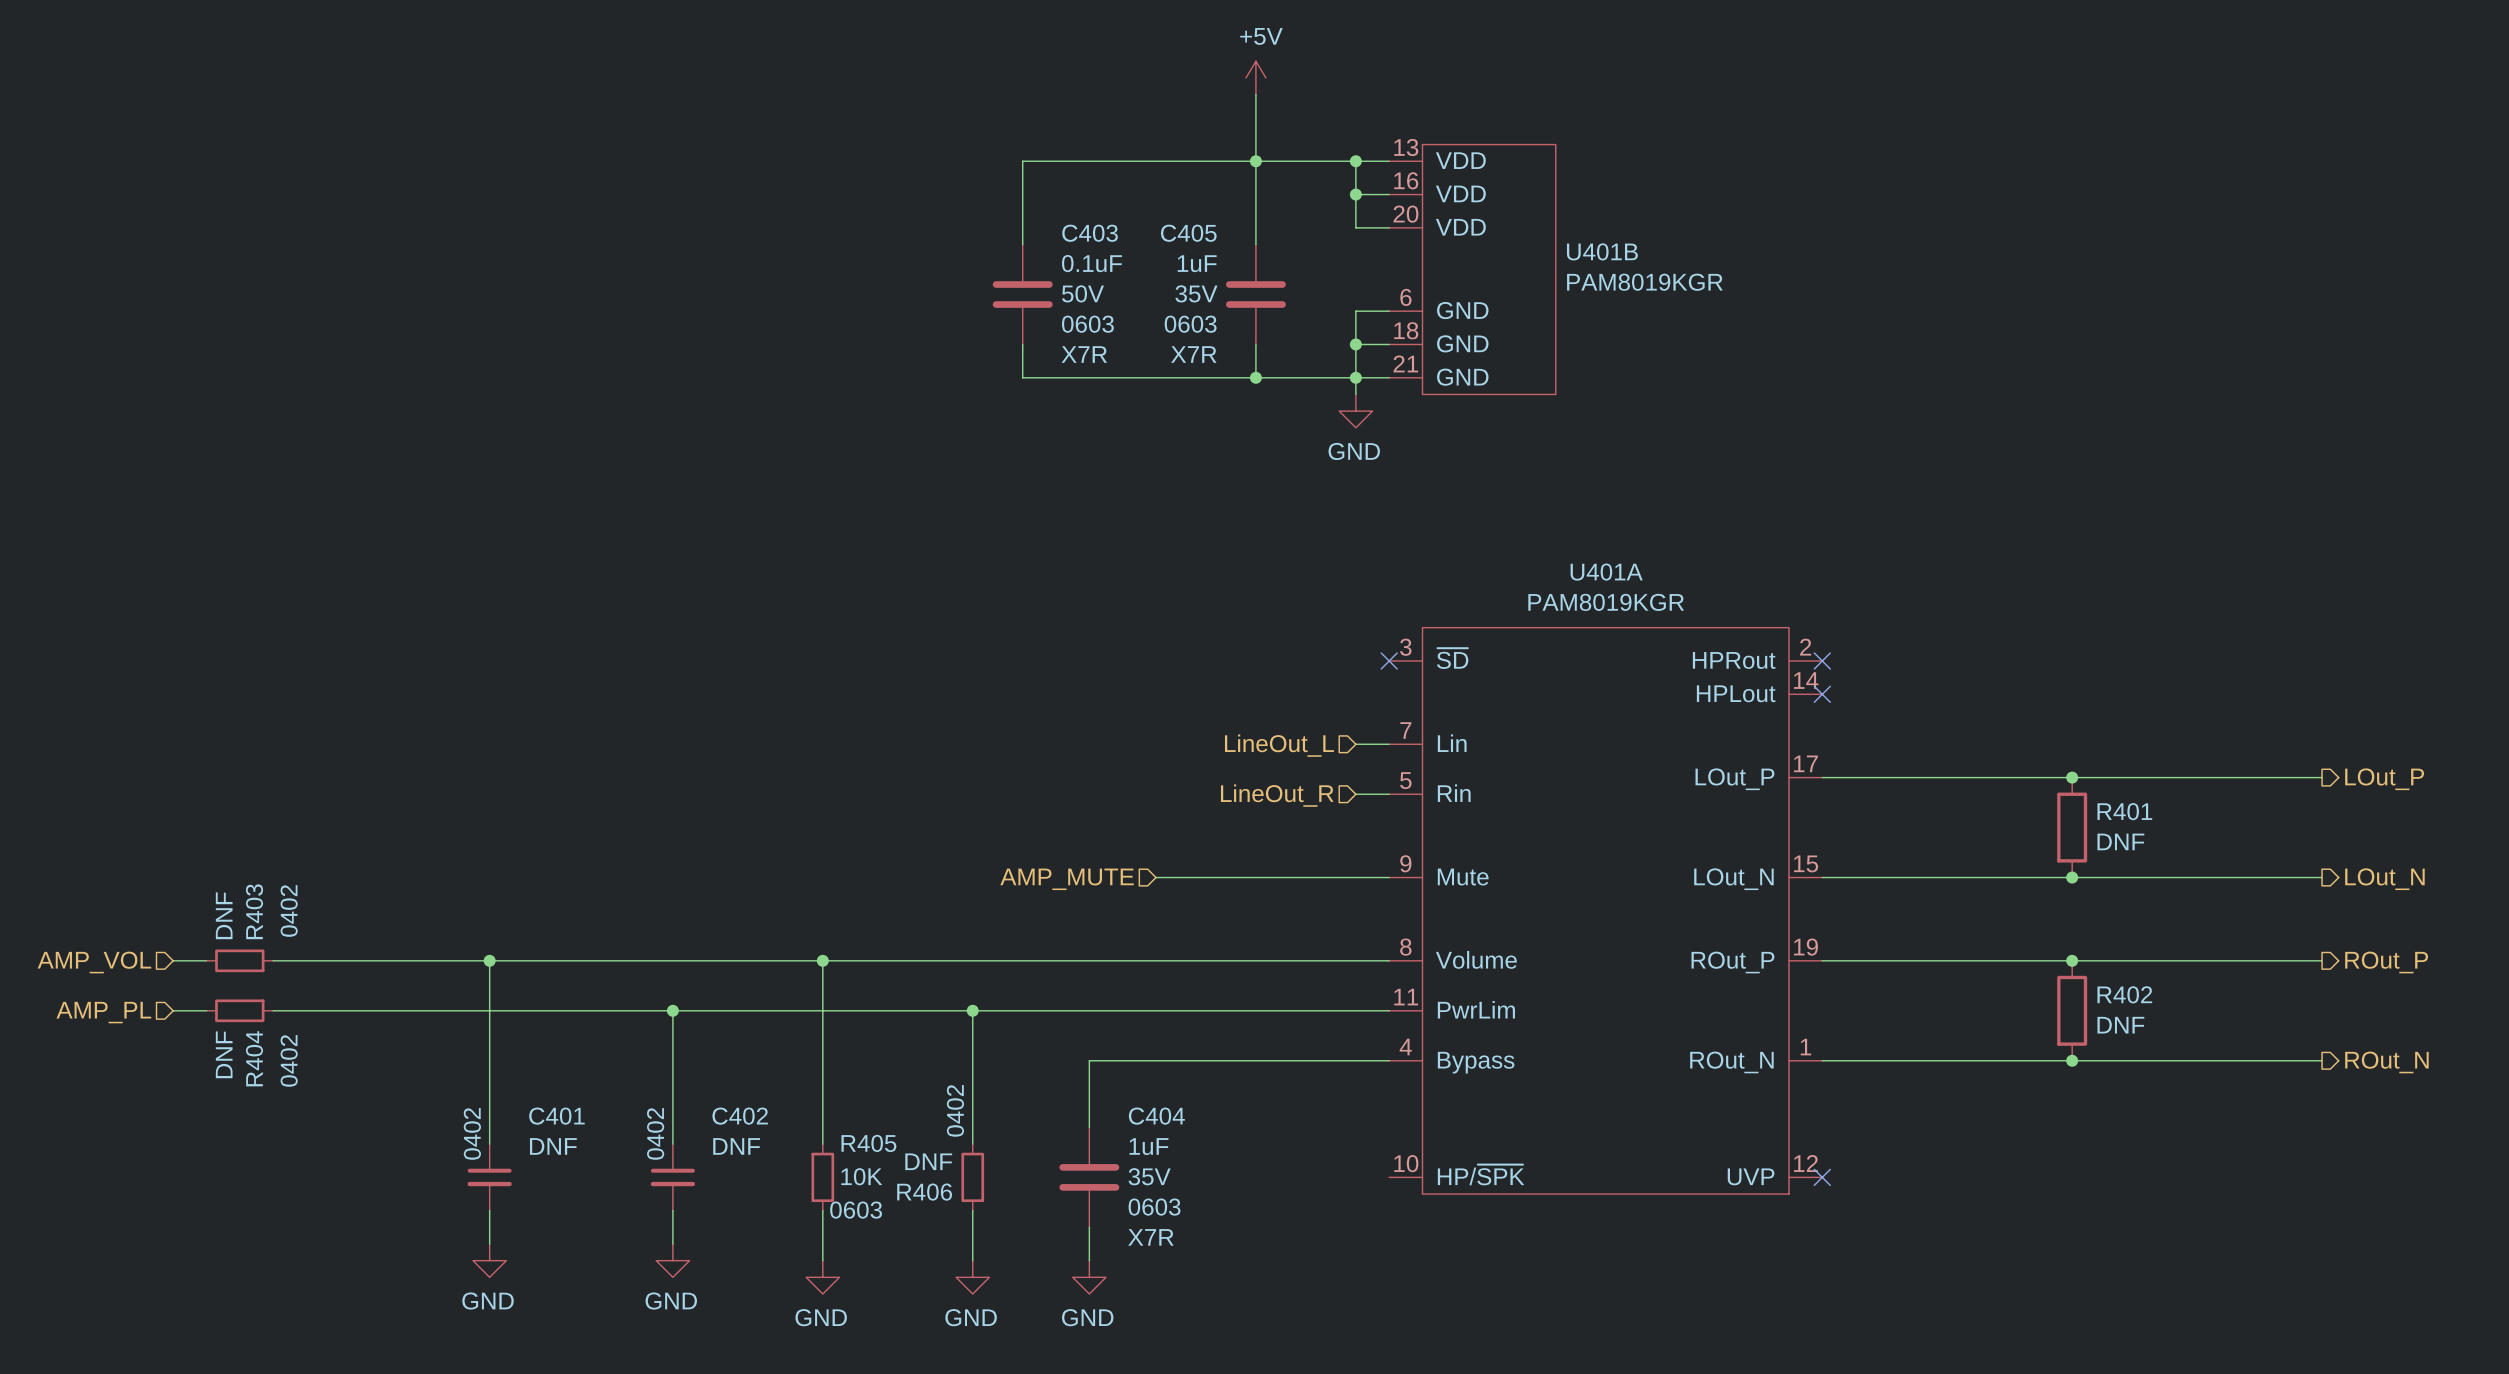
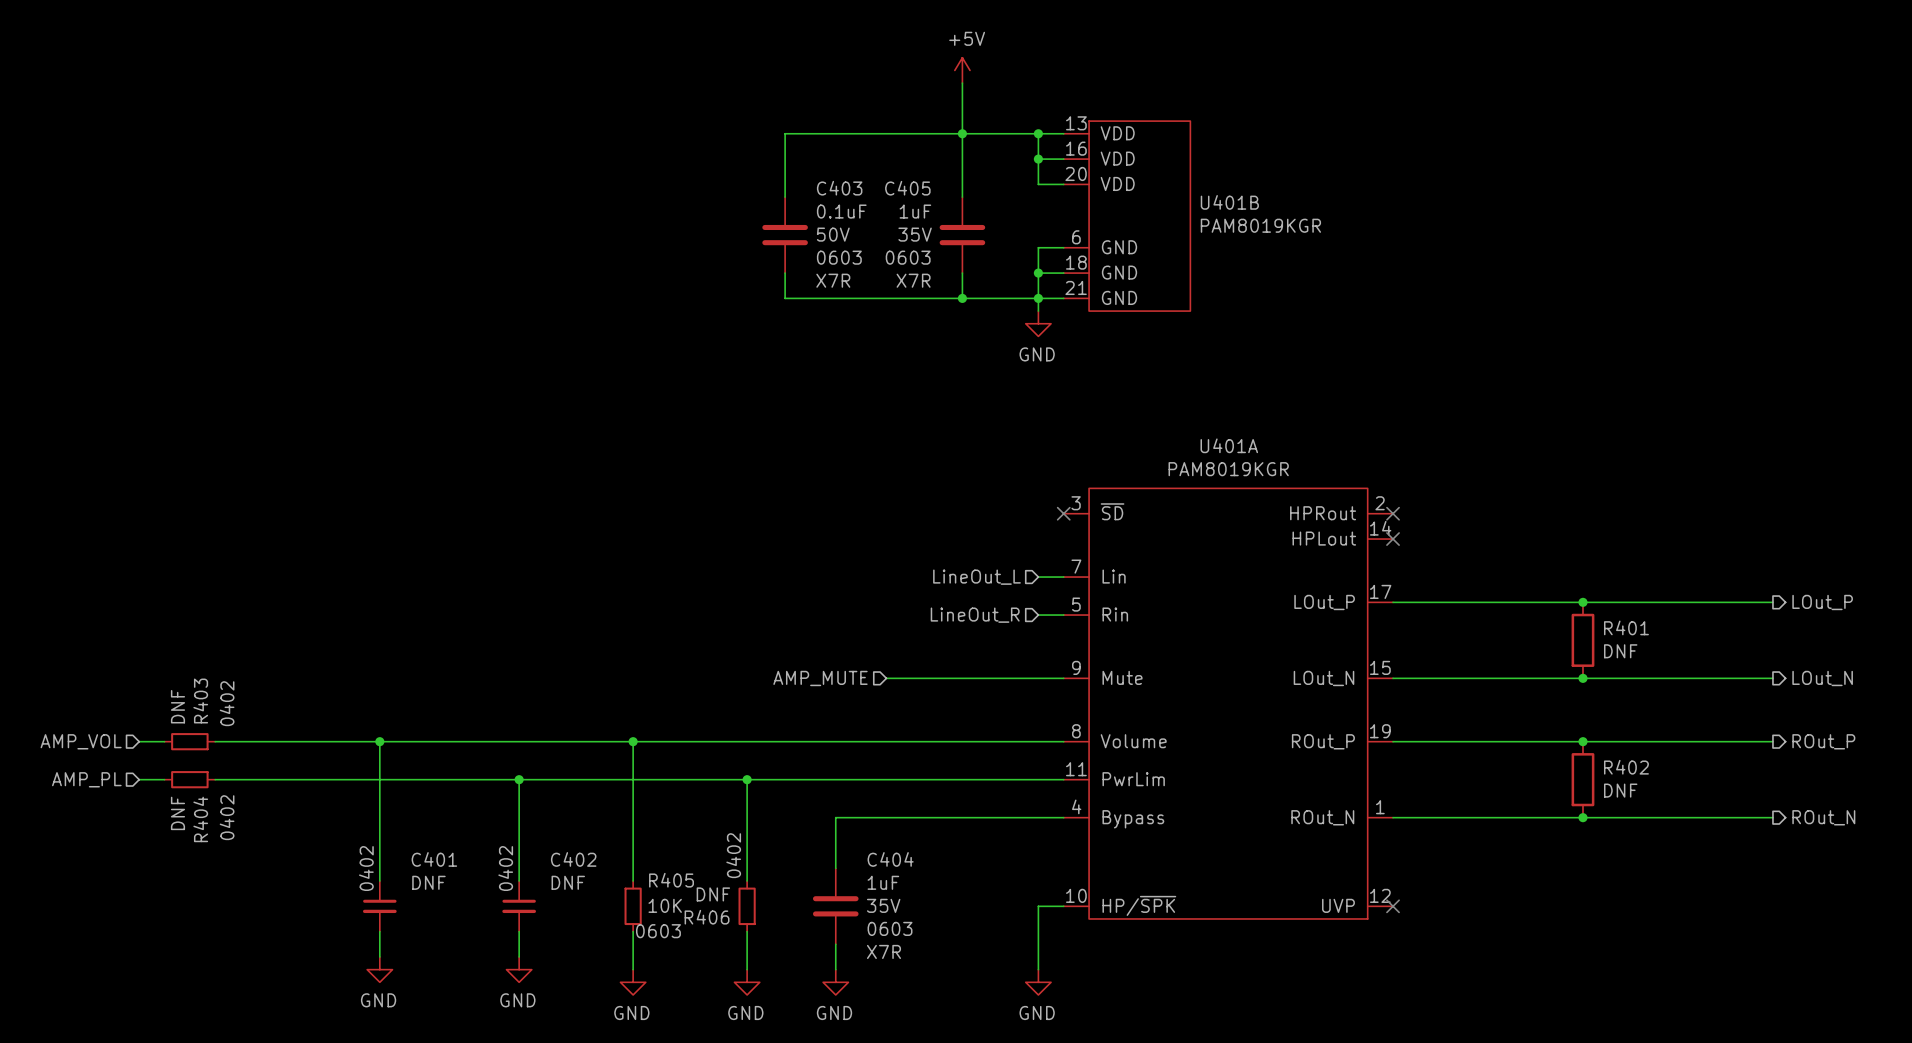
wire: none -> (1063, 906) (1038, 906) (1038, 969)
power symbol: none -> GND (1038, 982)

